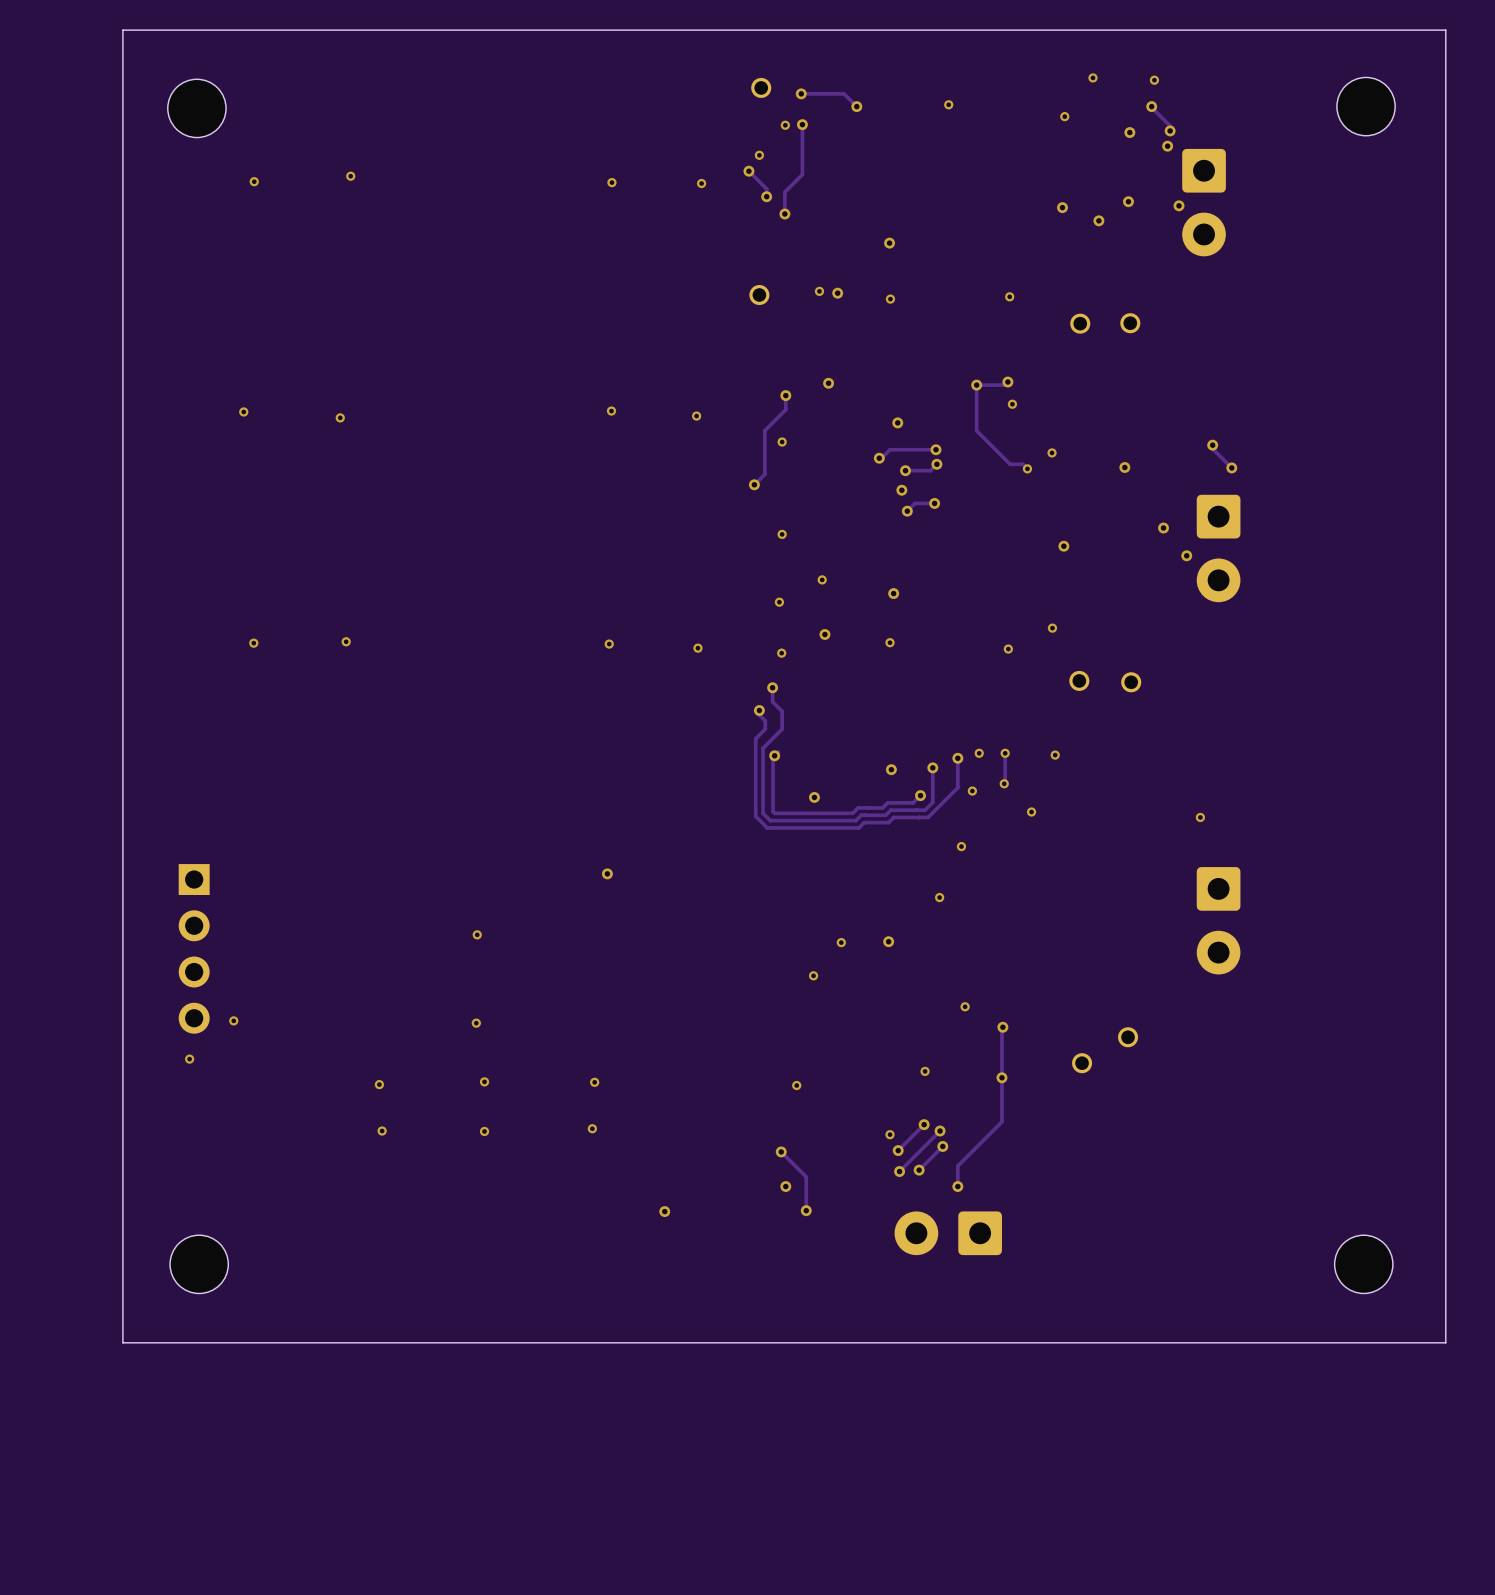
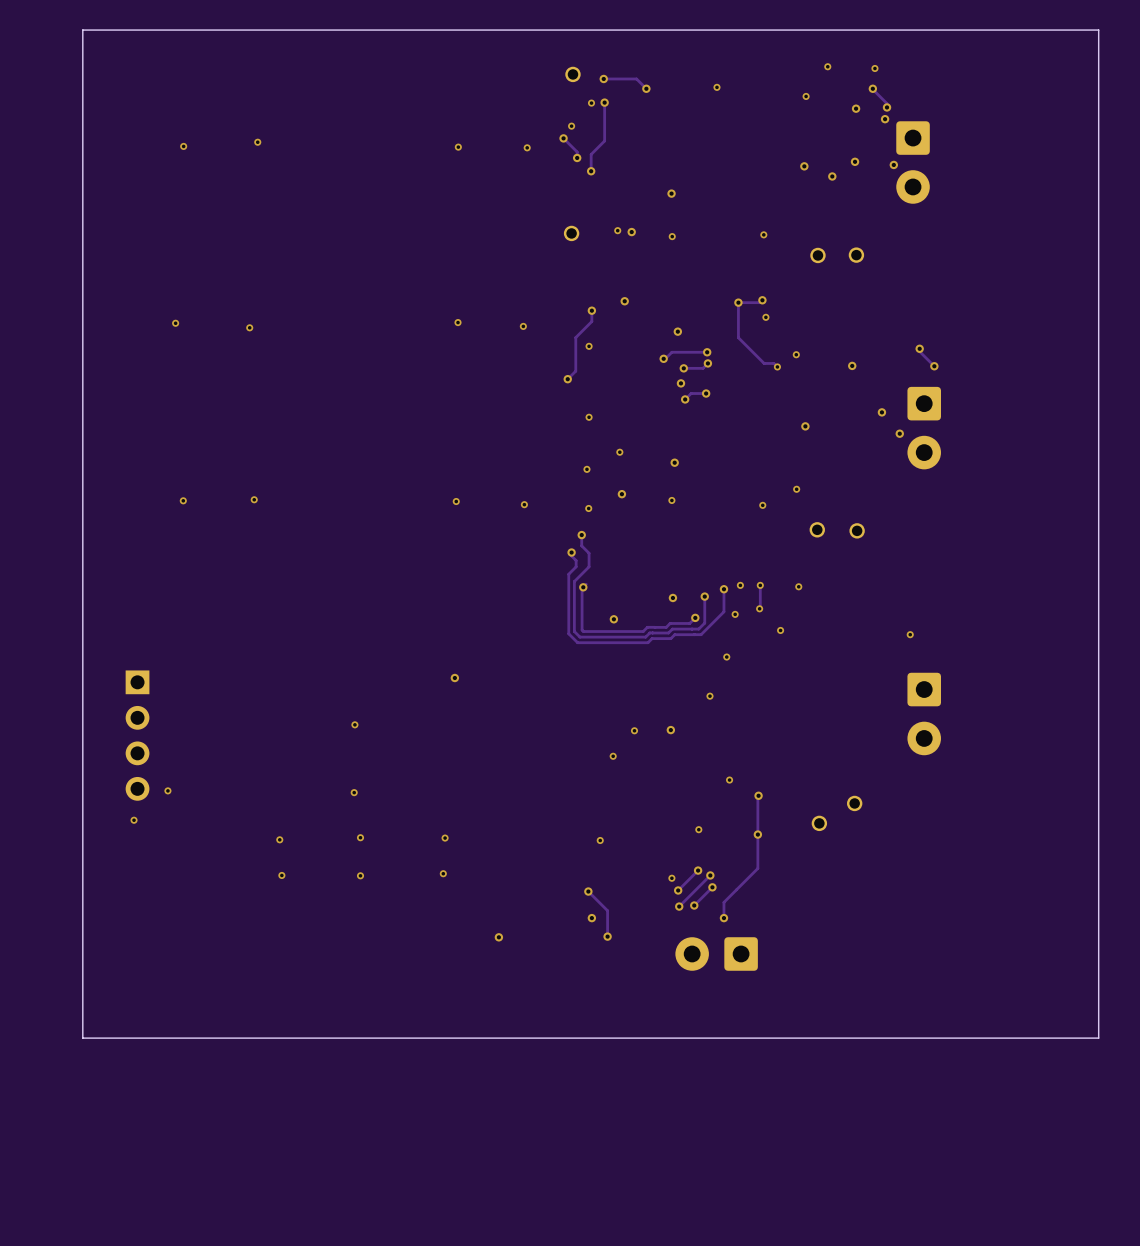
part: (1366, 106) -> none
part: (196, 108) -> none
part: (199, 1264) -> none
part: (1363, 1264) -> none

